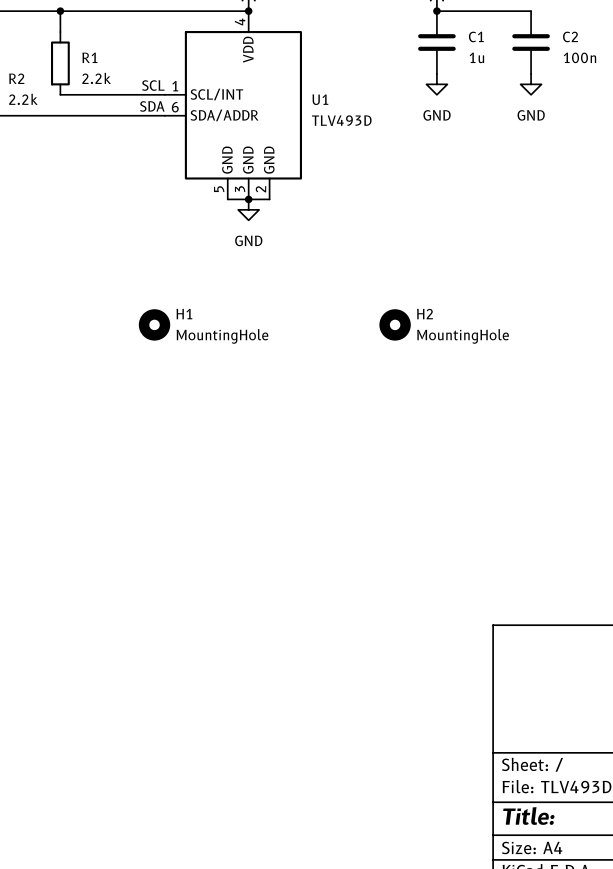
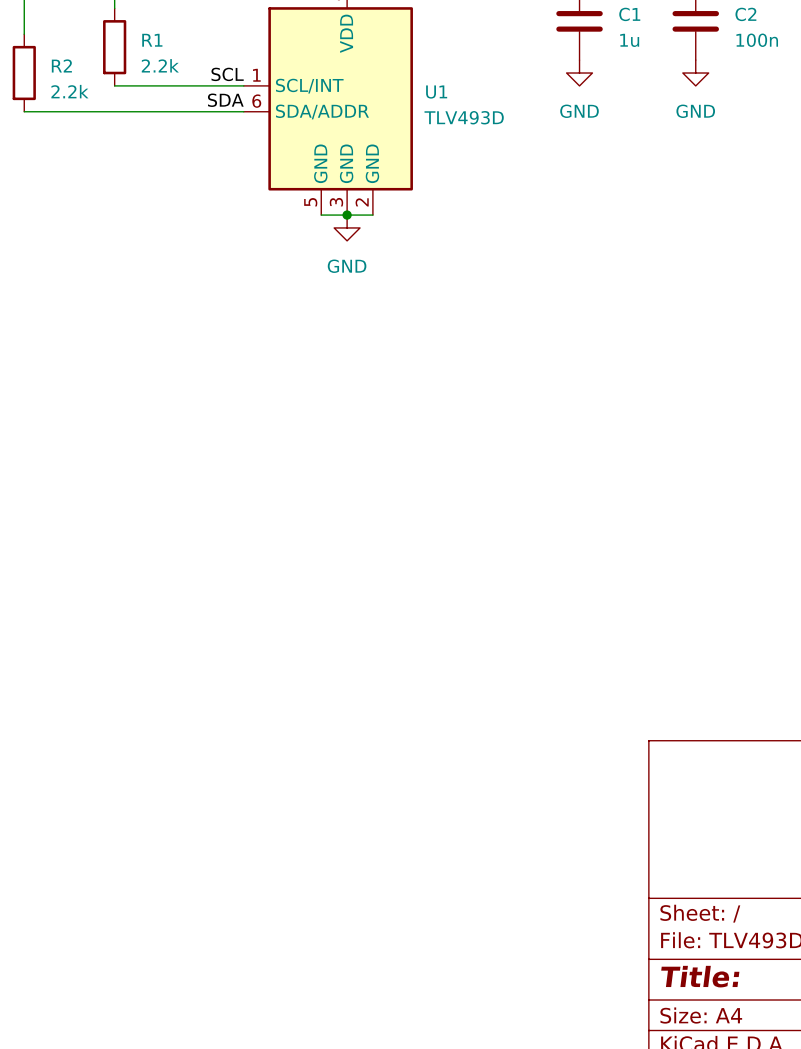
H1: MountingHole (154, 324) -> none
H2: MountingHole (395, 324) -> none

